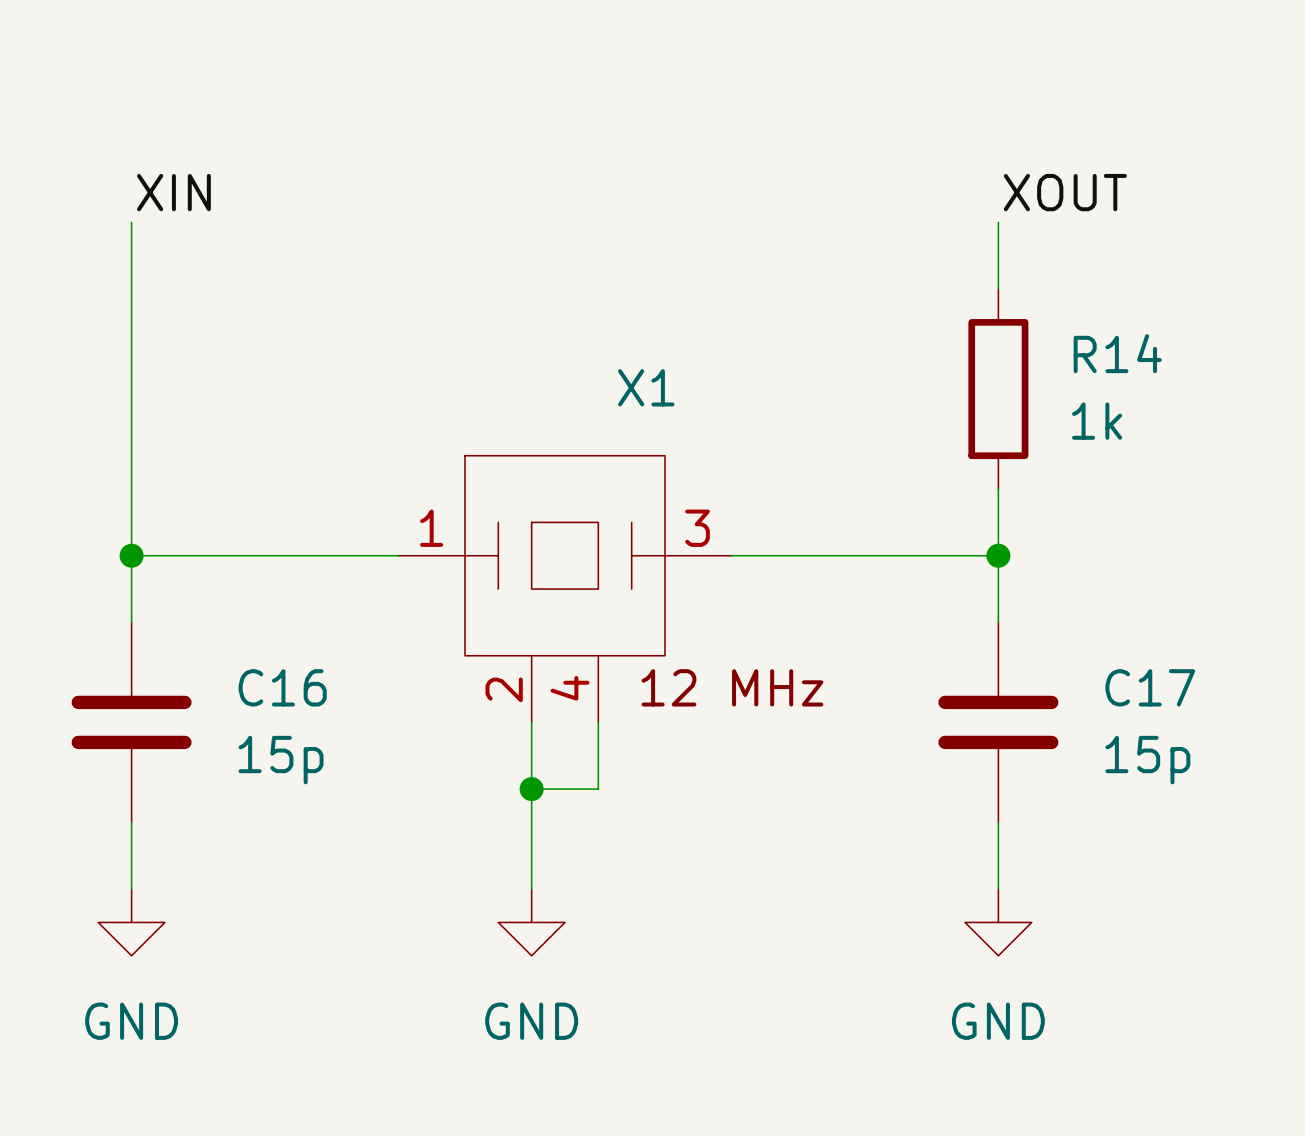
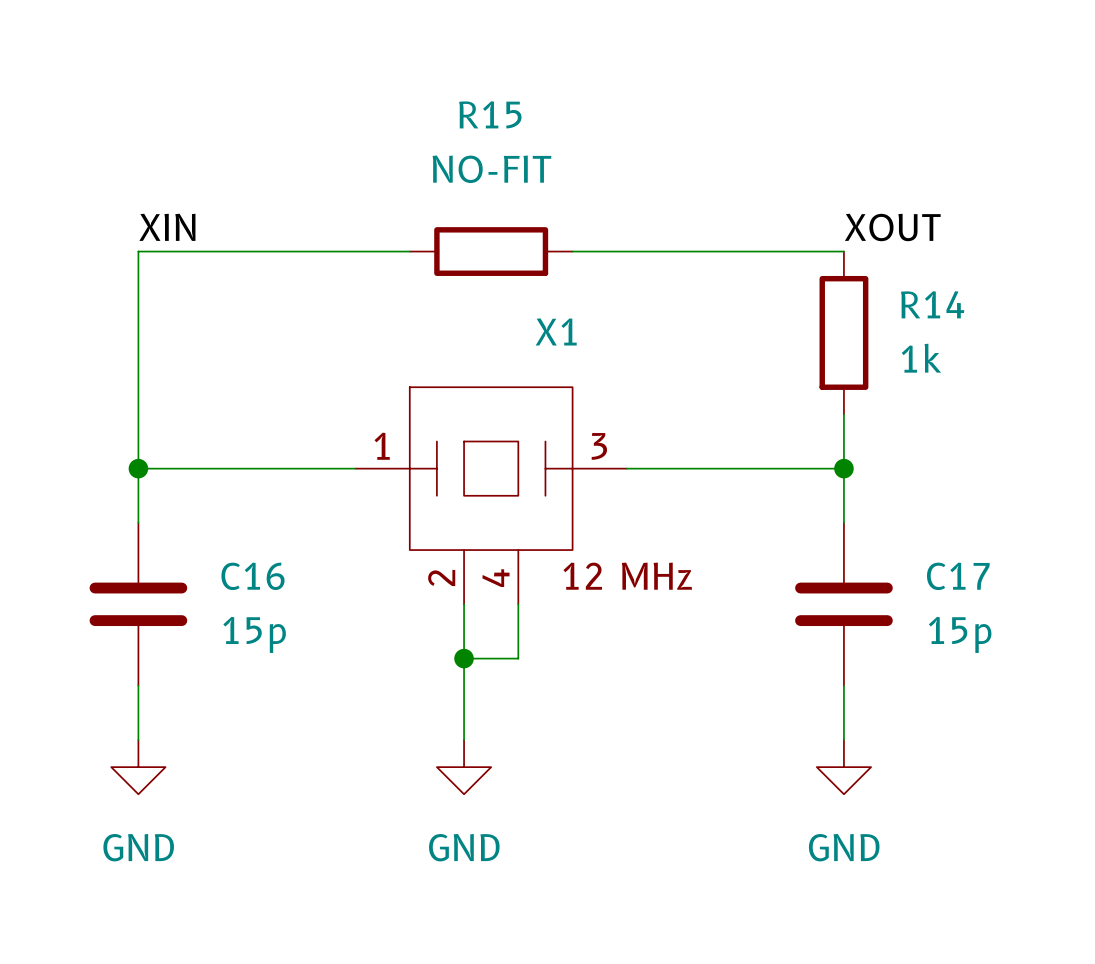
label position: XIN (173, 192) -> XIN (167, 227)
label position: XOUT (1065, 192) -> XOUT (892, 227)
wire: (131, 222) (131, 289) -> (409, 251) (138, 251)
wire: (998, 222) (998, 289) -> (572, 251) (843, 251)
R15: none -> NO-FIT (491, 251)

